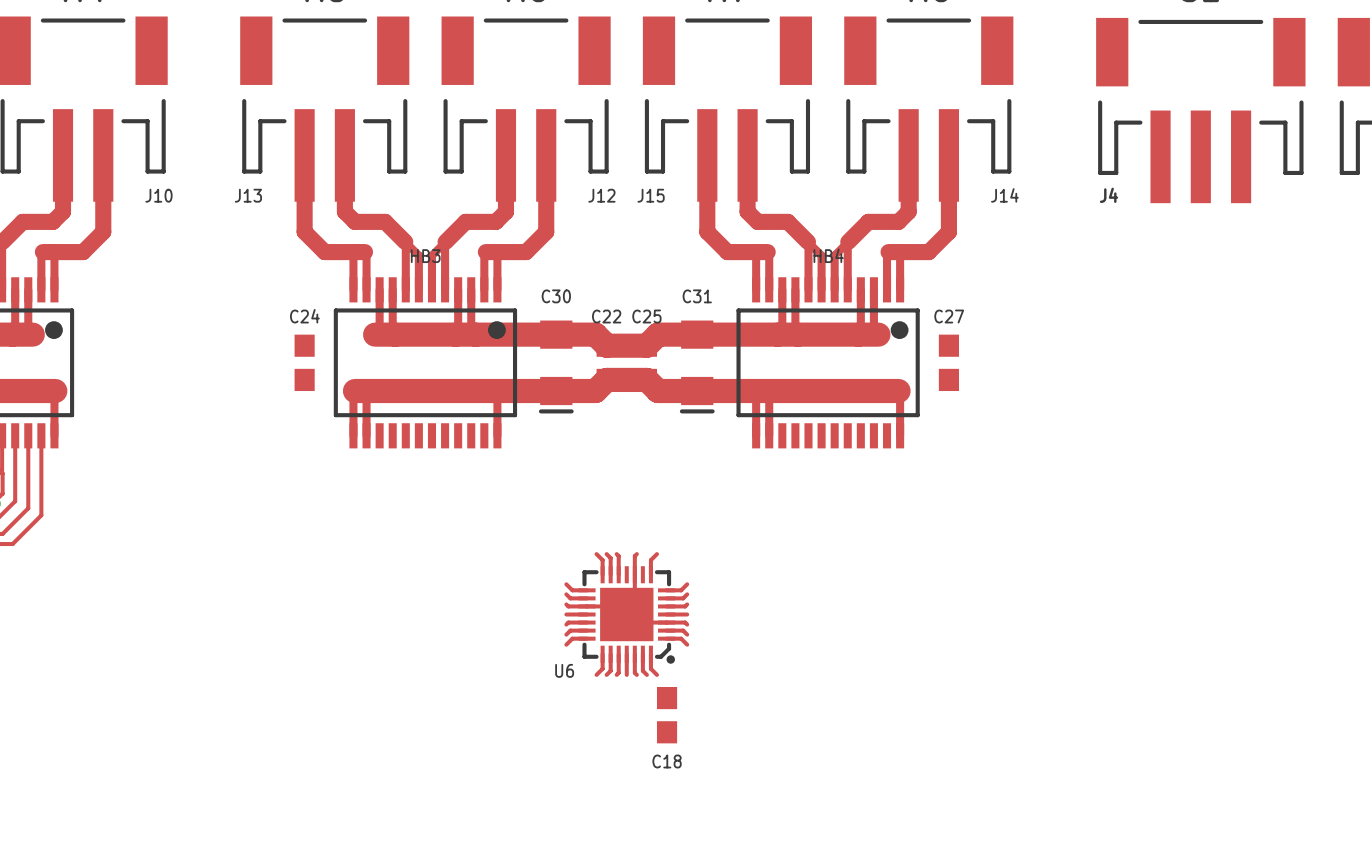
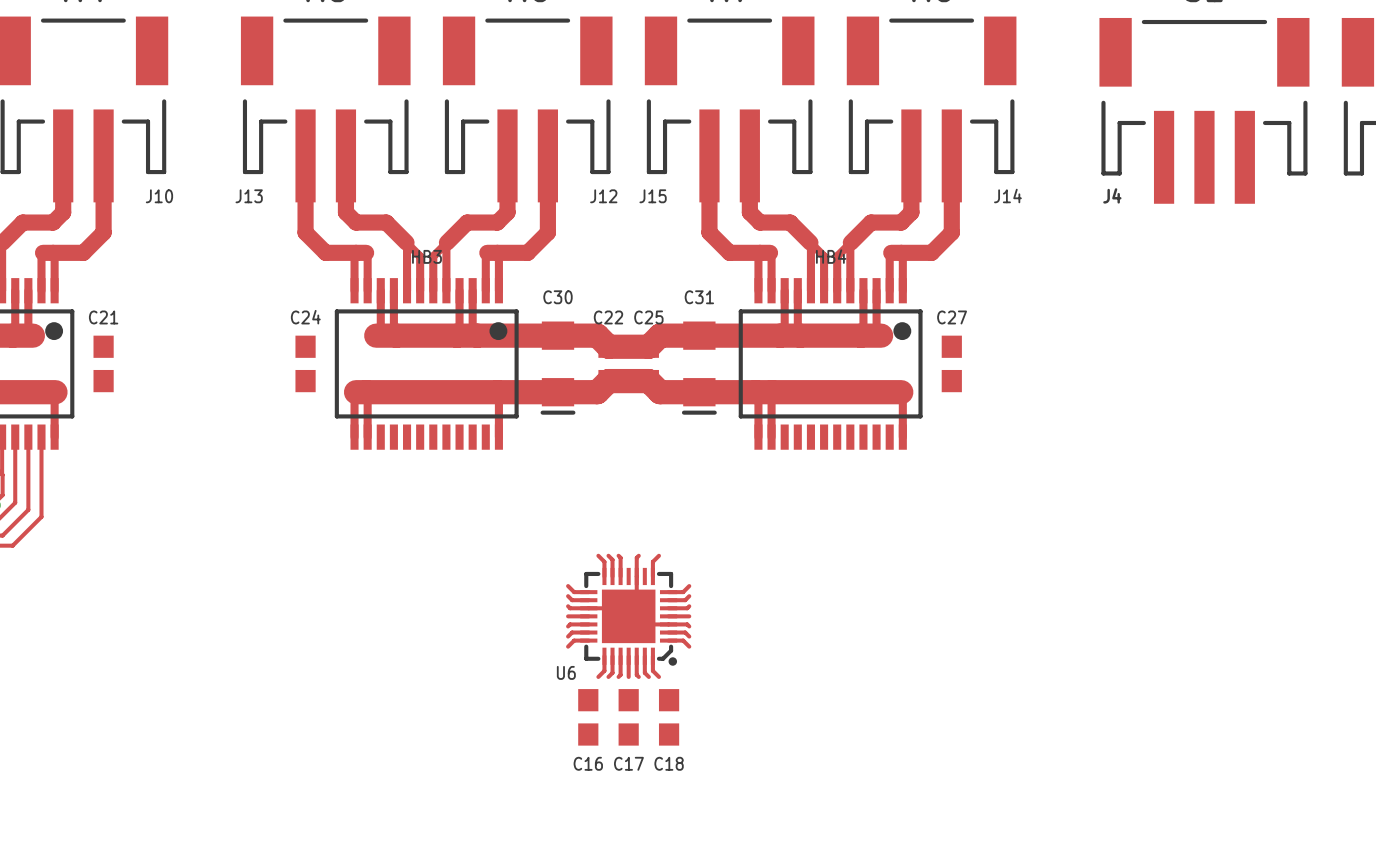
C21: none -> (103, 363)
C16: none -> (588, 717)
C17: none -> (628, 717)

